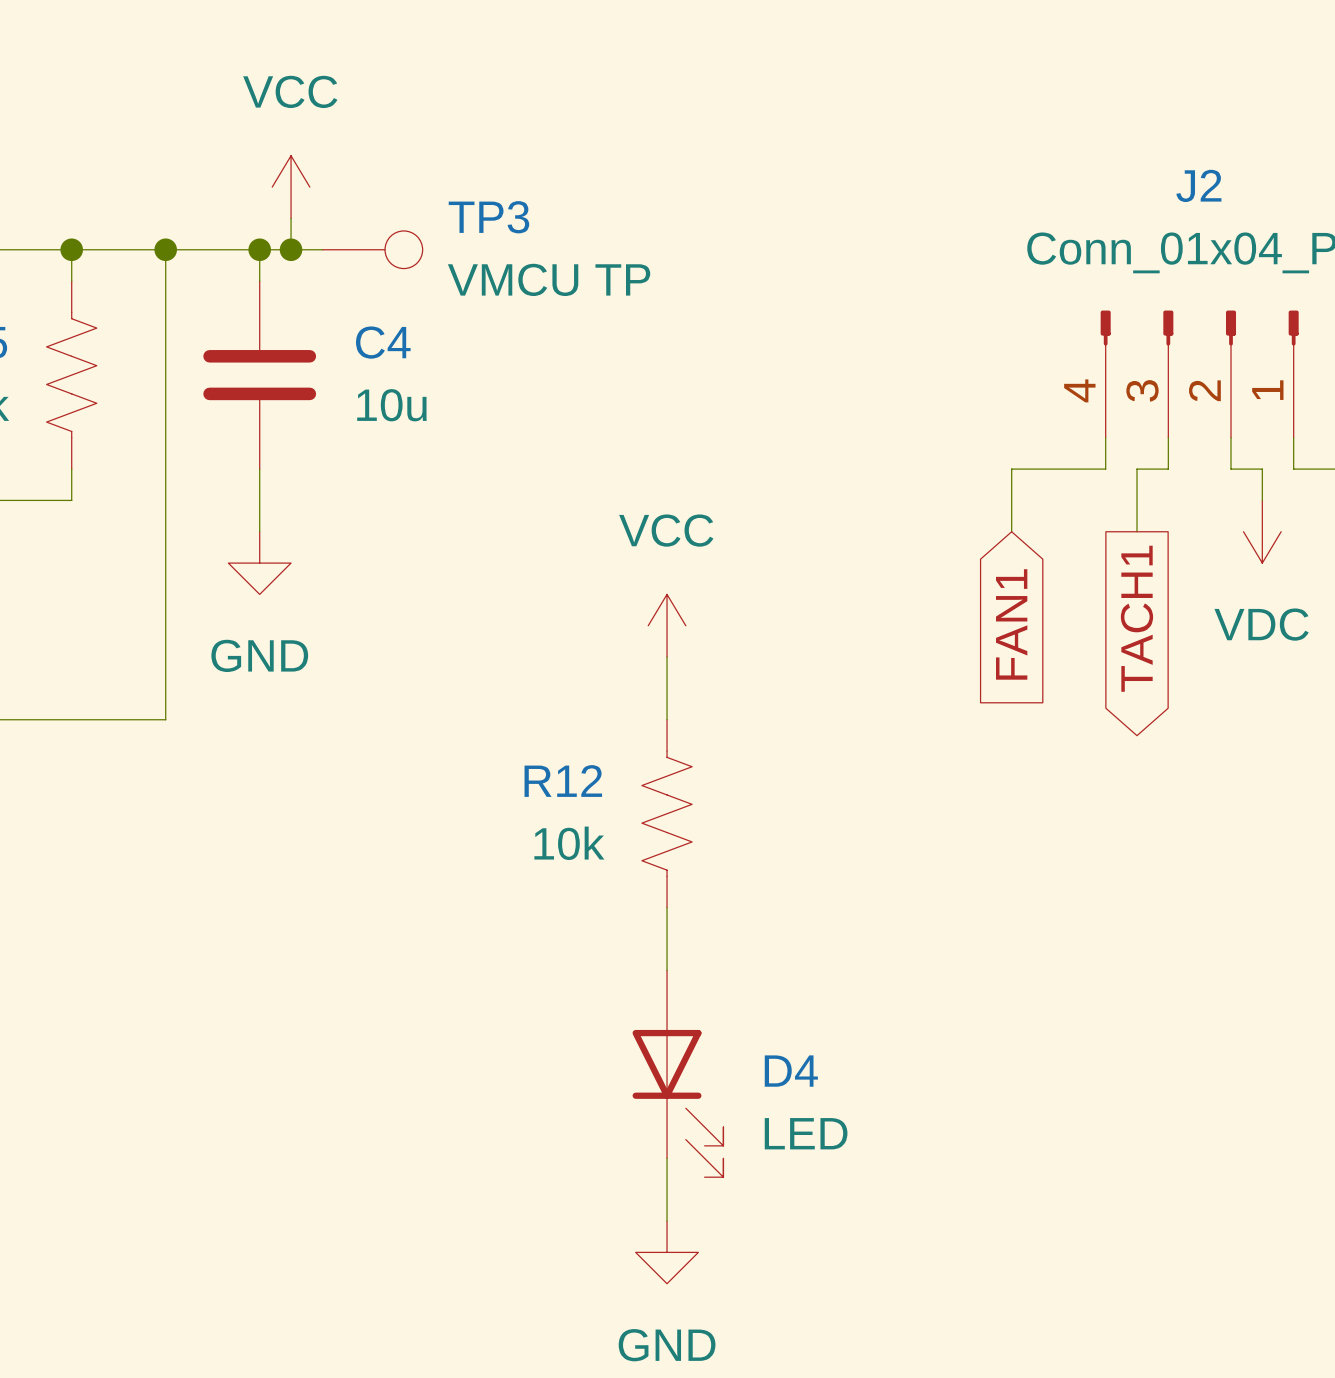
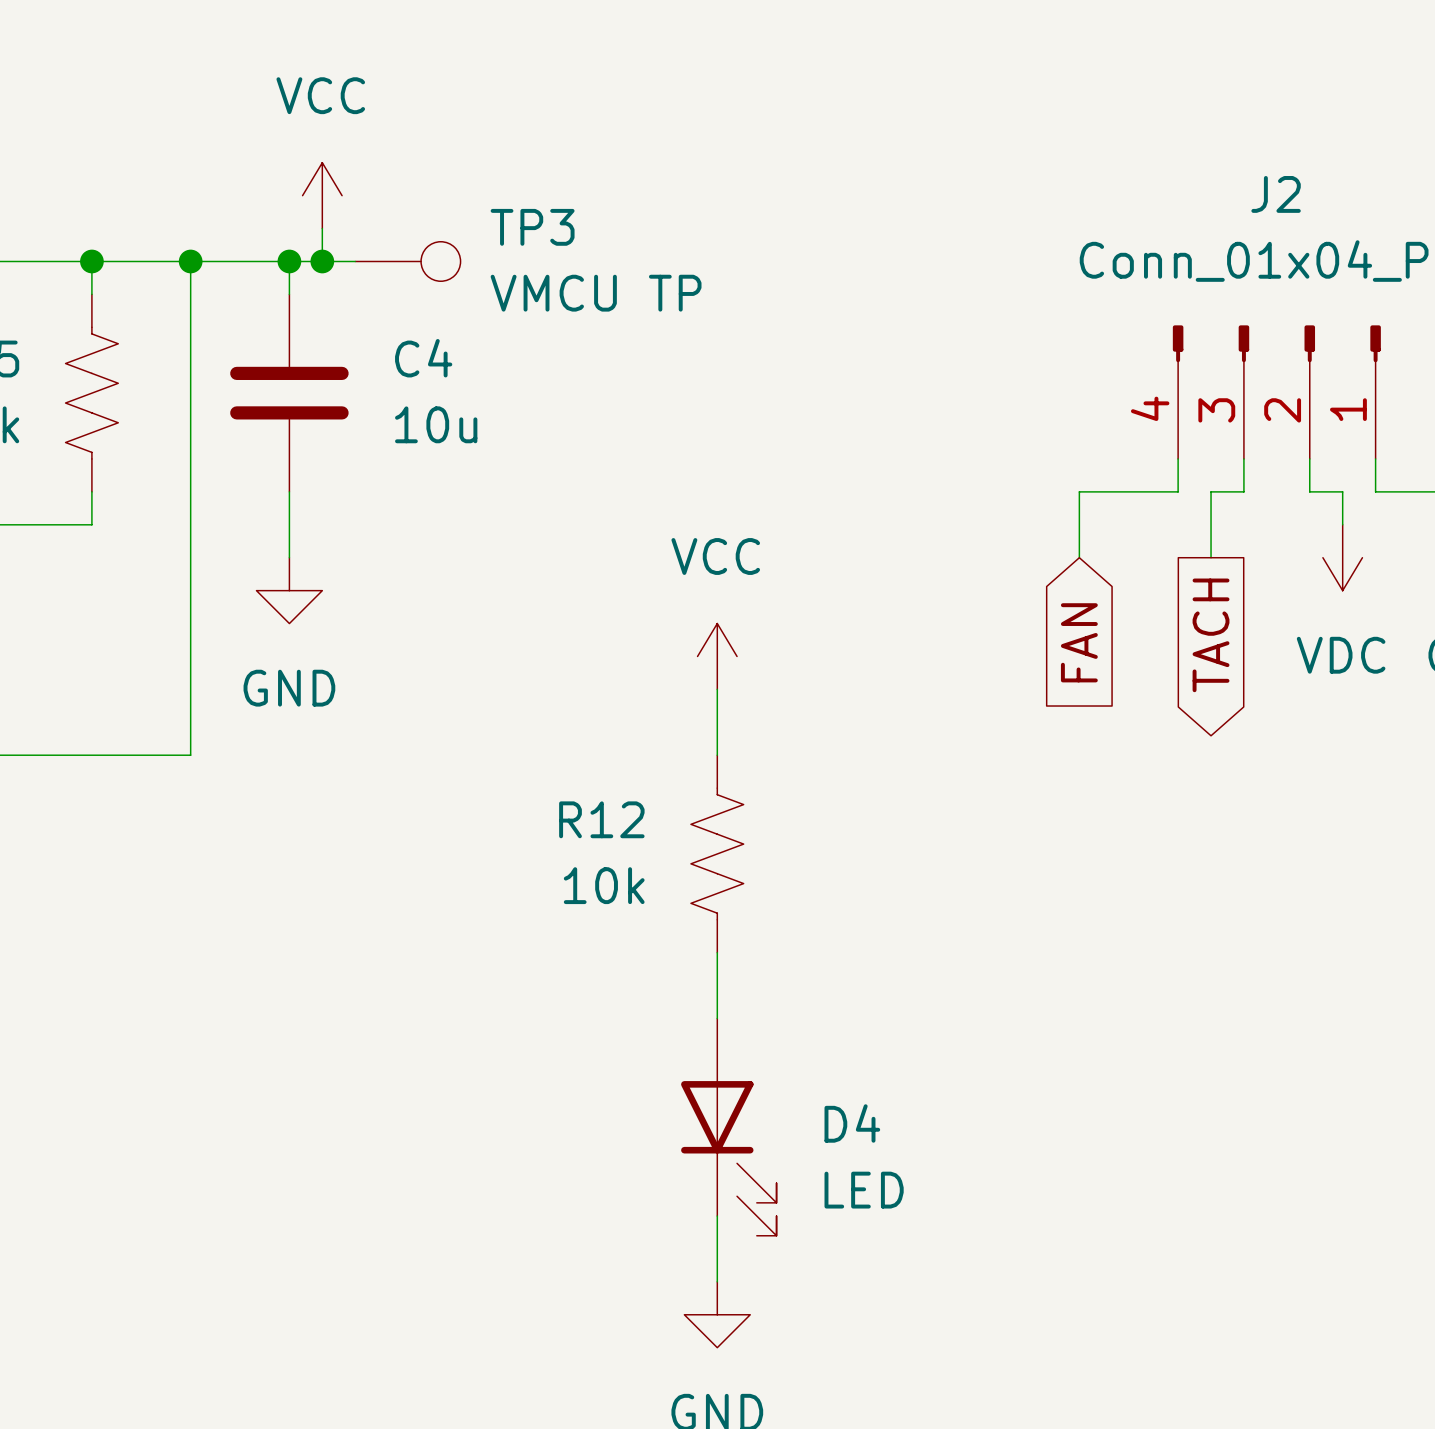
global label: TACH1 (1136, 618) -> TACH (1211, 635)
global label: FAN1 (1011, 624) -> FAN (1079, 642)

